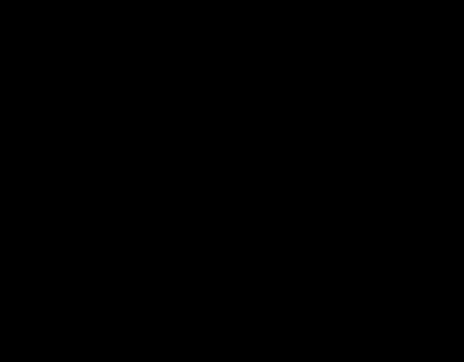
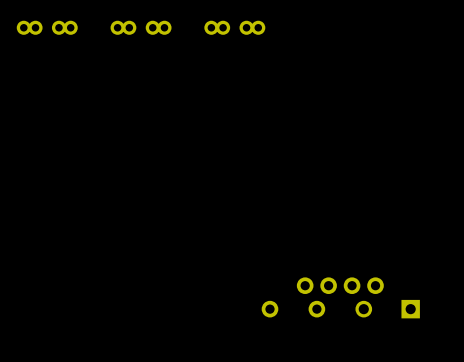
part: none -> (47, 27)
part: none -> (141, 27)
part: none -> (234, 27)
part: none -> (340, 297)

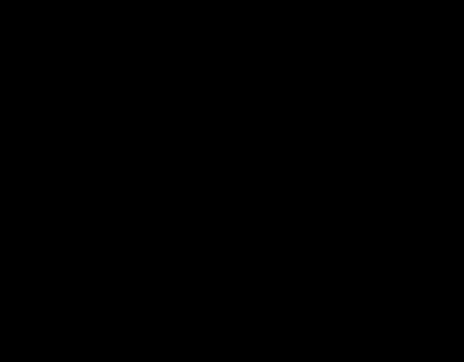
part: (47, 27) -> none
part: (141, 27) -> none
part: (234, 27) -> none
part: (340, 297) -> none

